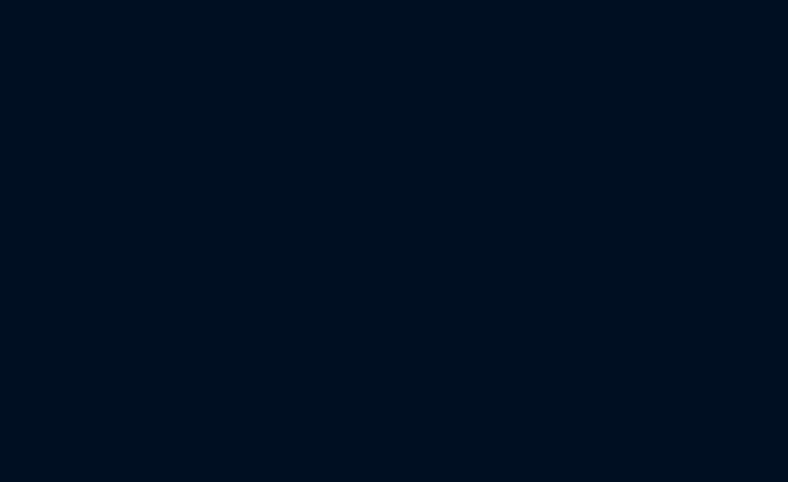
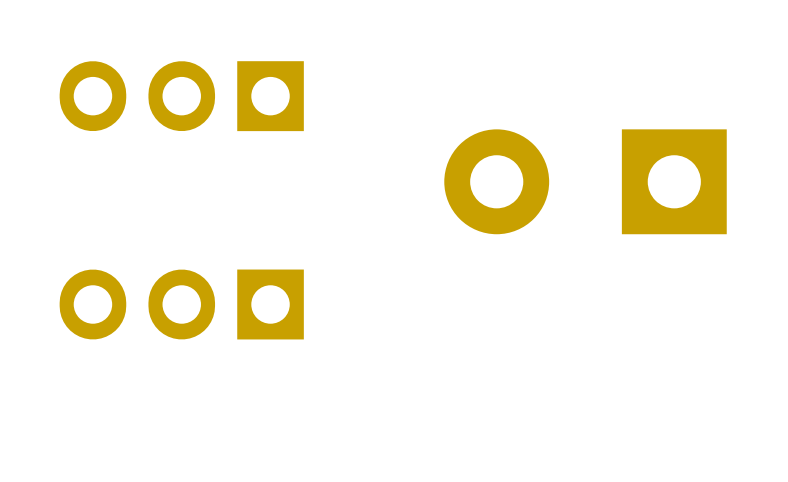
part: none -> (181, 96)
part: none -> (585, 181)
part: none -> (181, 304)

